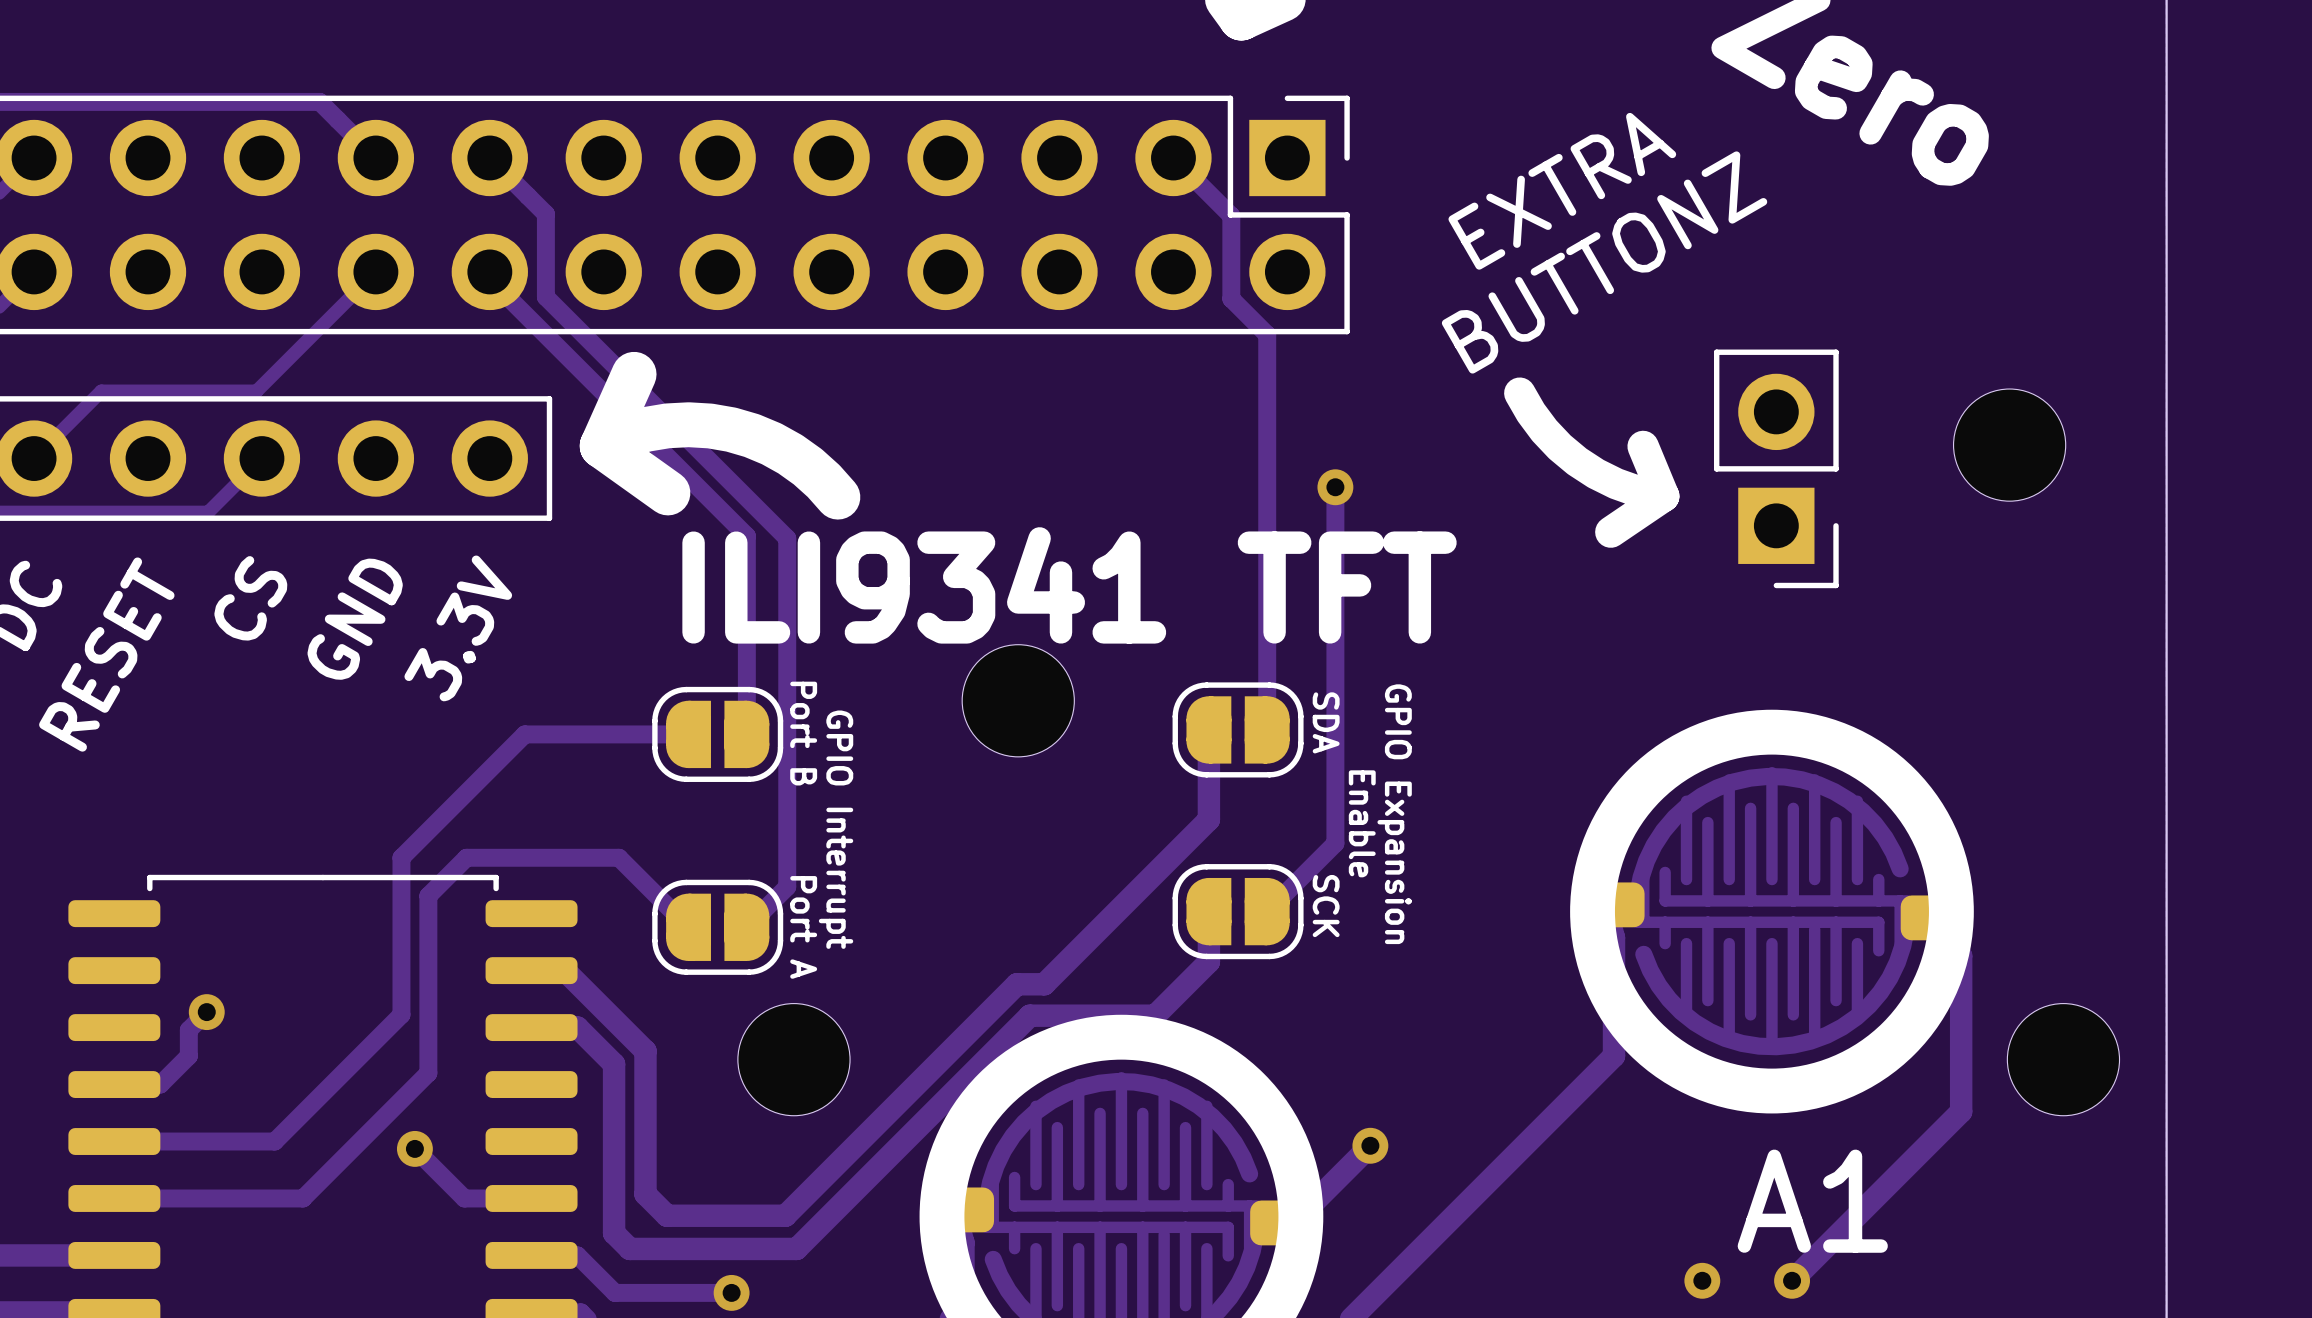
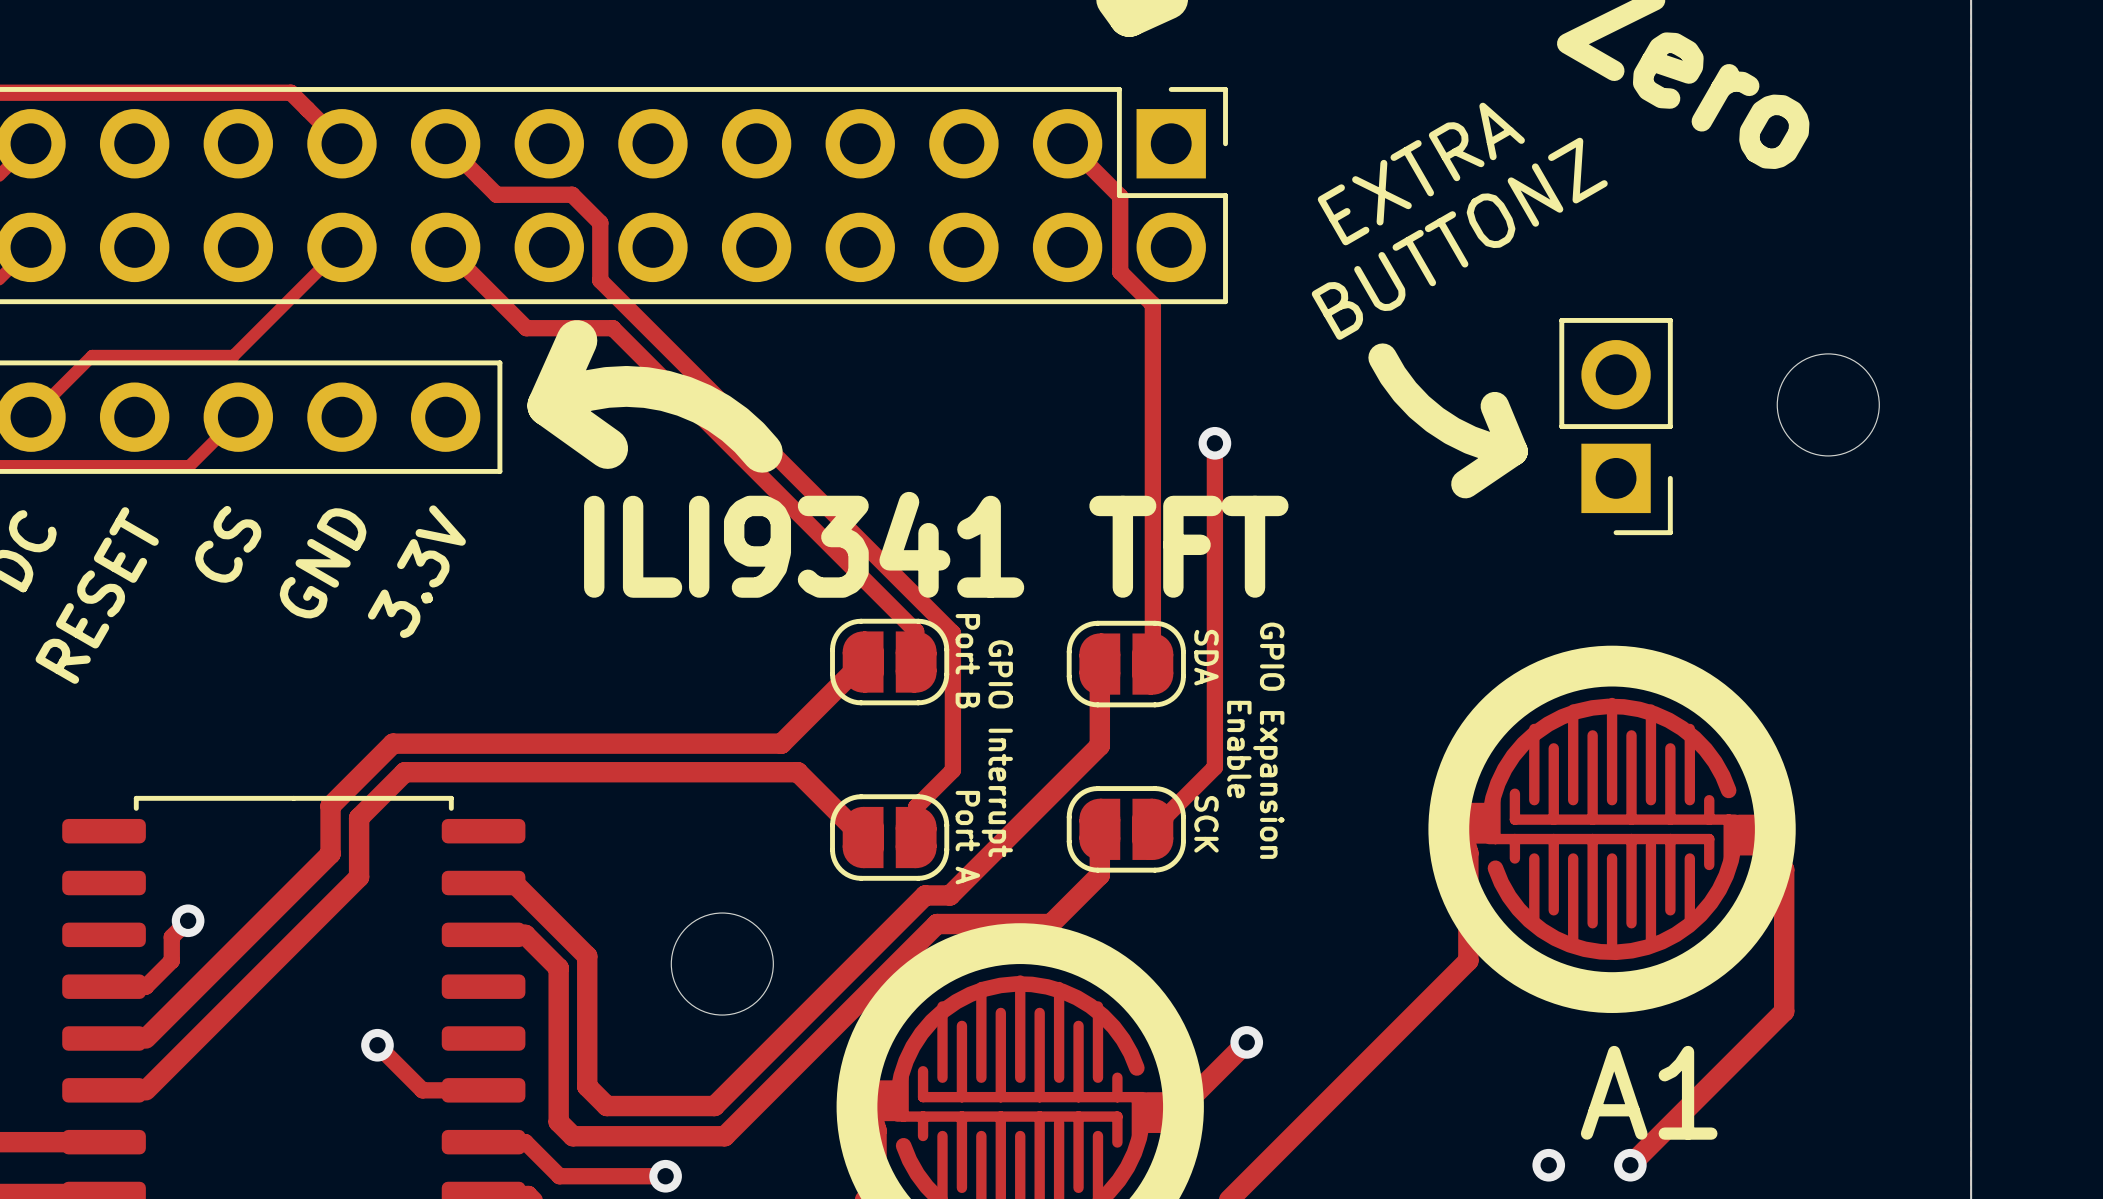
track: (545, 214) (545, 297) (787, 538) (787, 886) (746, 927) -> (496, 194) (572, 194) (600, 222) (600, 280) (952, 633) (952, 770) (916, 807) (916, 837)
track: (489, 271) (489, 279) (746, 536) (746, 734) -> (445, 247) (526, 328) (612, 328) (916, 631)
text position: ILI9341 TFT (1069, 585) -> ILI9341 TFT (936, 544)
part: (1018, 700) -> none
part: none -> (889, 662)
track: (688, 734) (524, 734) (401, 857) (401, 1014) (274, 1141) (160, 1141) -> (863, 662) (781, 743) (392, 743) (330, 806) (330, 853) (145, 1038)
part: (717, 734) -> none
text position: GPIO Interrupt (836, 829) -> GPIO Interrupt (997, 748)
text position: Port B Port A (803, 830) -> Port B Port A (967, 749)
part: none -> (889, 837)
track: (688, 927) (619, 857) (466, 857) (428, 895) (428, 1073) (302, 1198) (160, 1198) -> (863, 837) (797, 772) (404, 772) (359, 817) (359, 877) (145, 1090)
part: (717, 927) -> none
part: (2063, 1059) -> none

